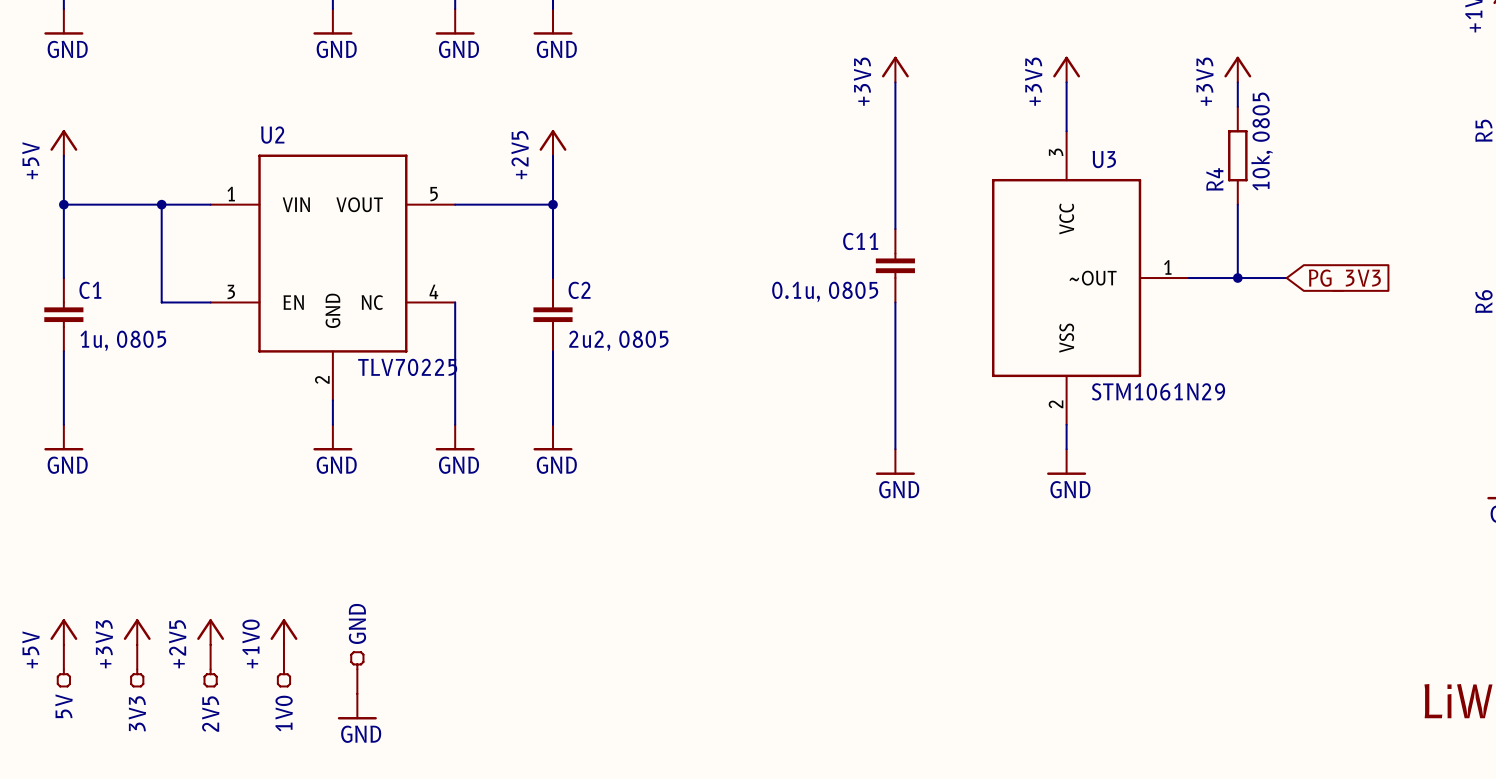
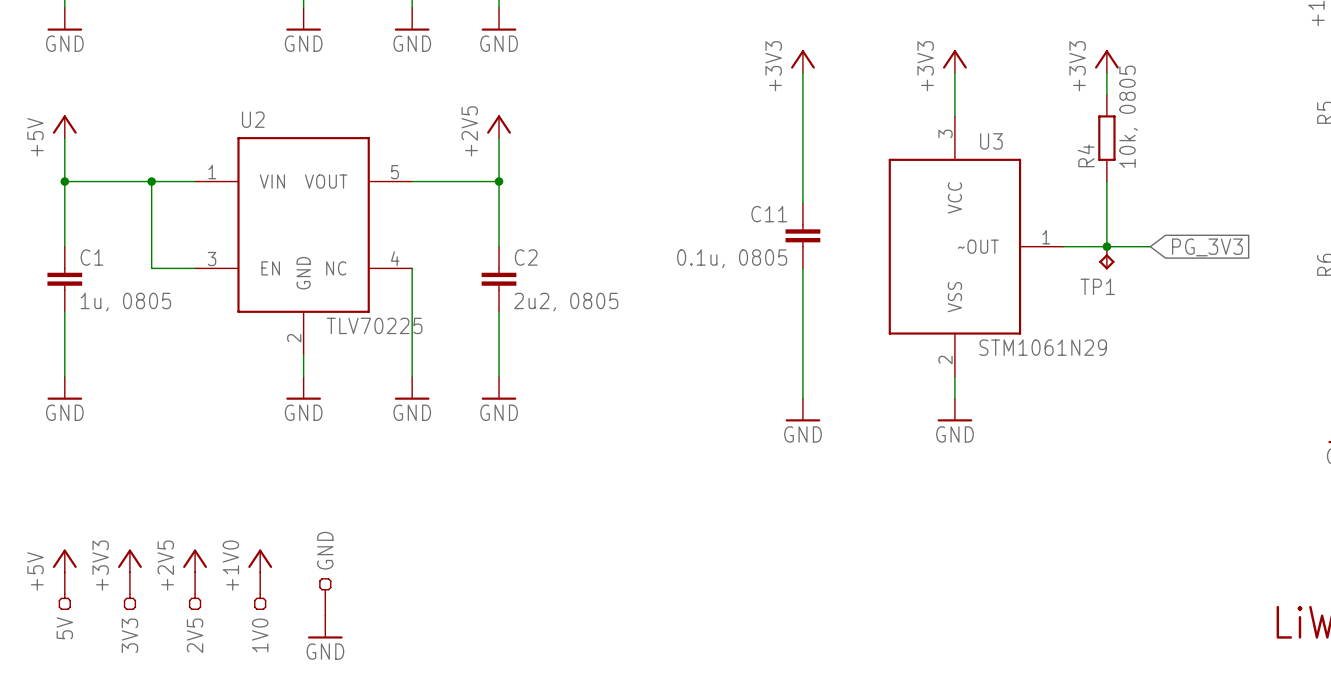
TP1: none -> (1106, 258)

